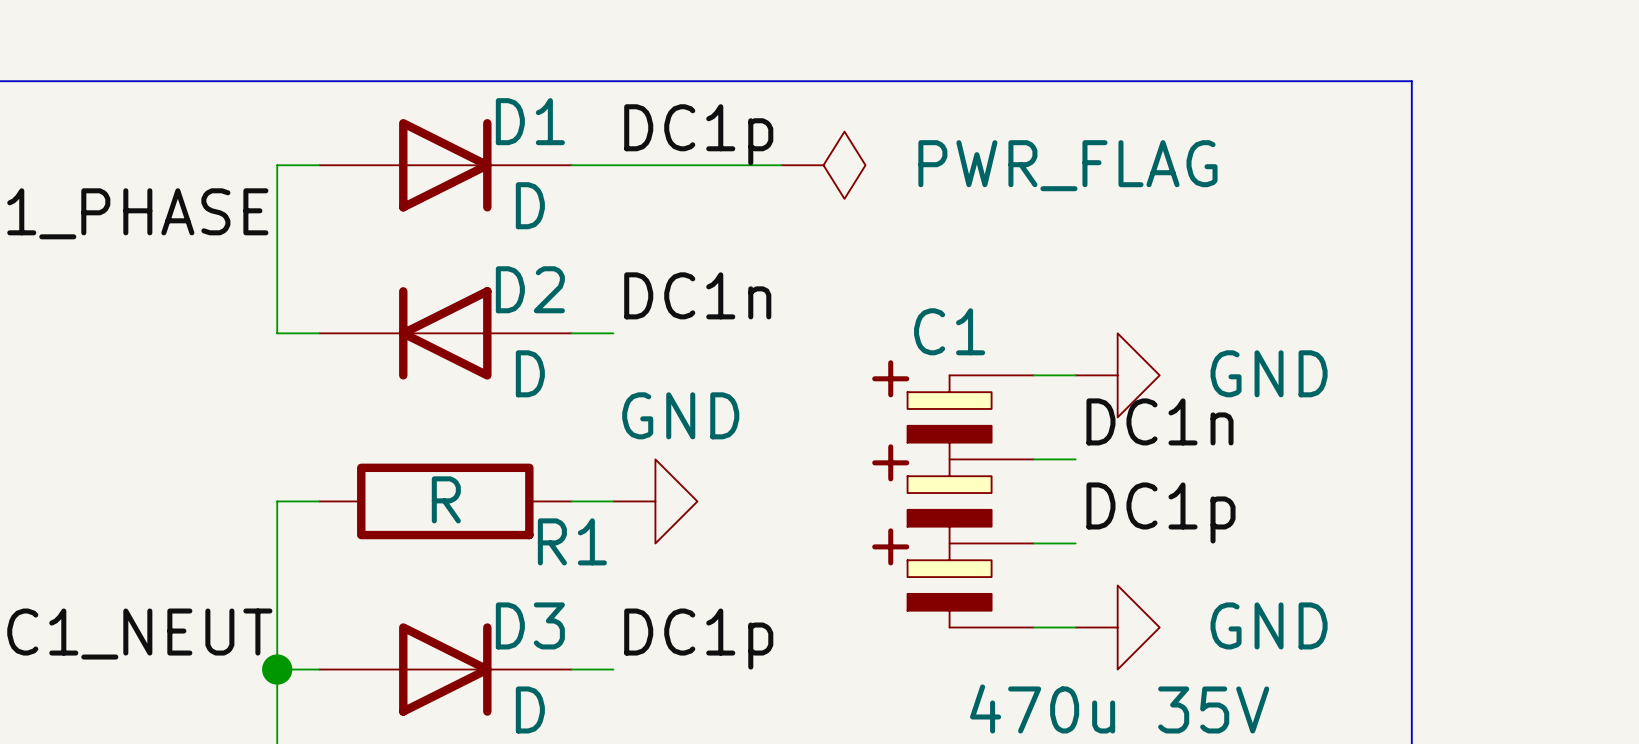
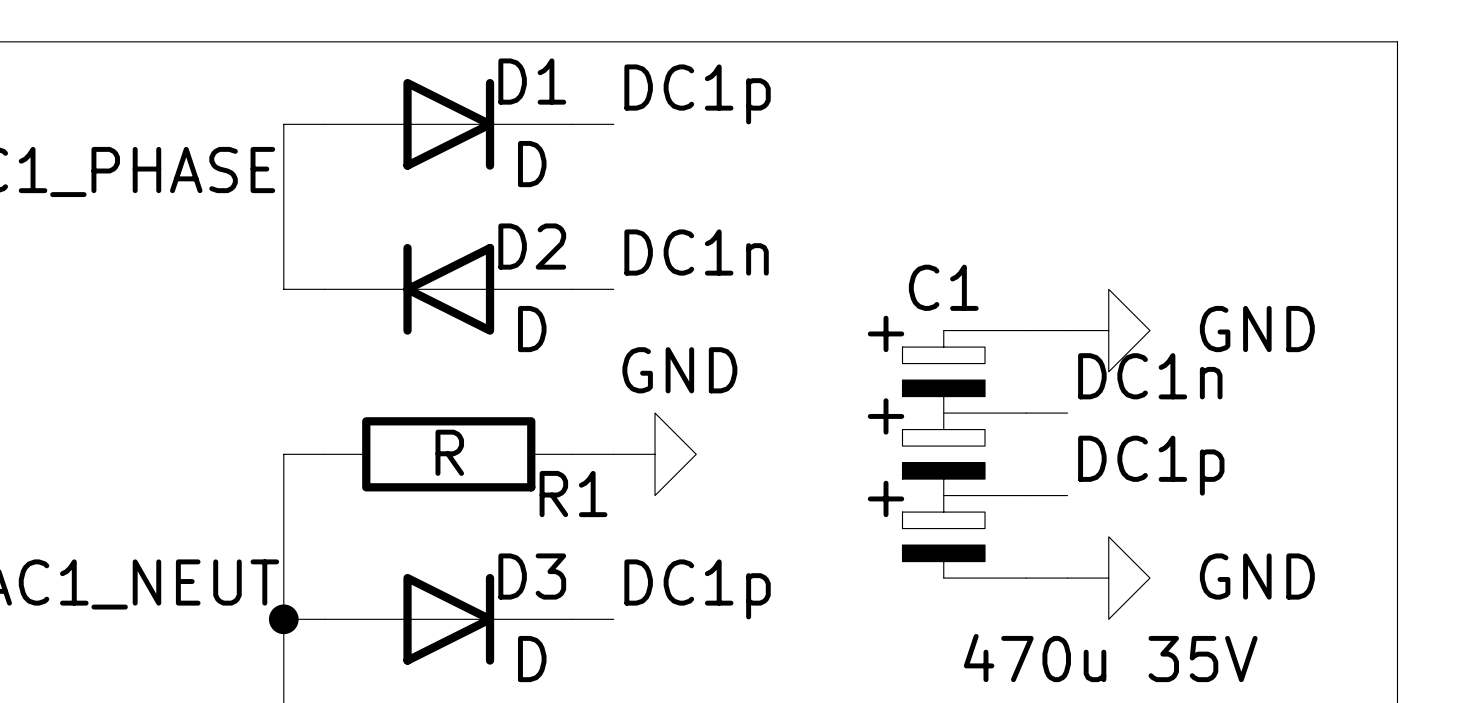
wire: (613, 165) (781, 165) -> none
power symbol: PWR_FLAG (823, 165) -> none

